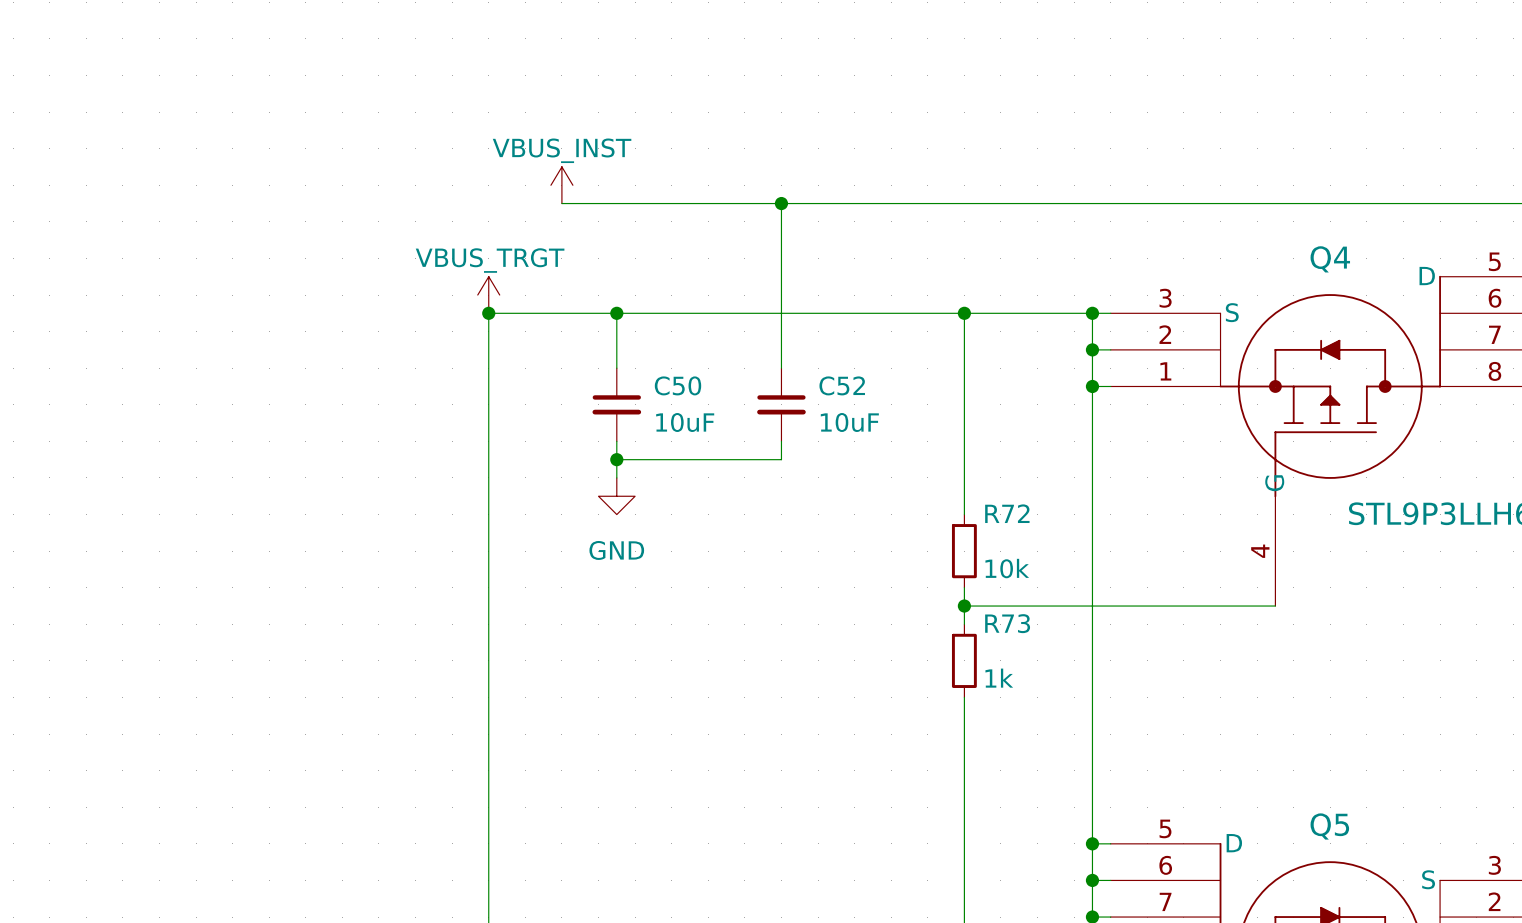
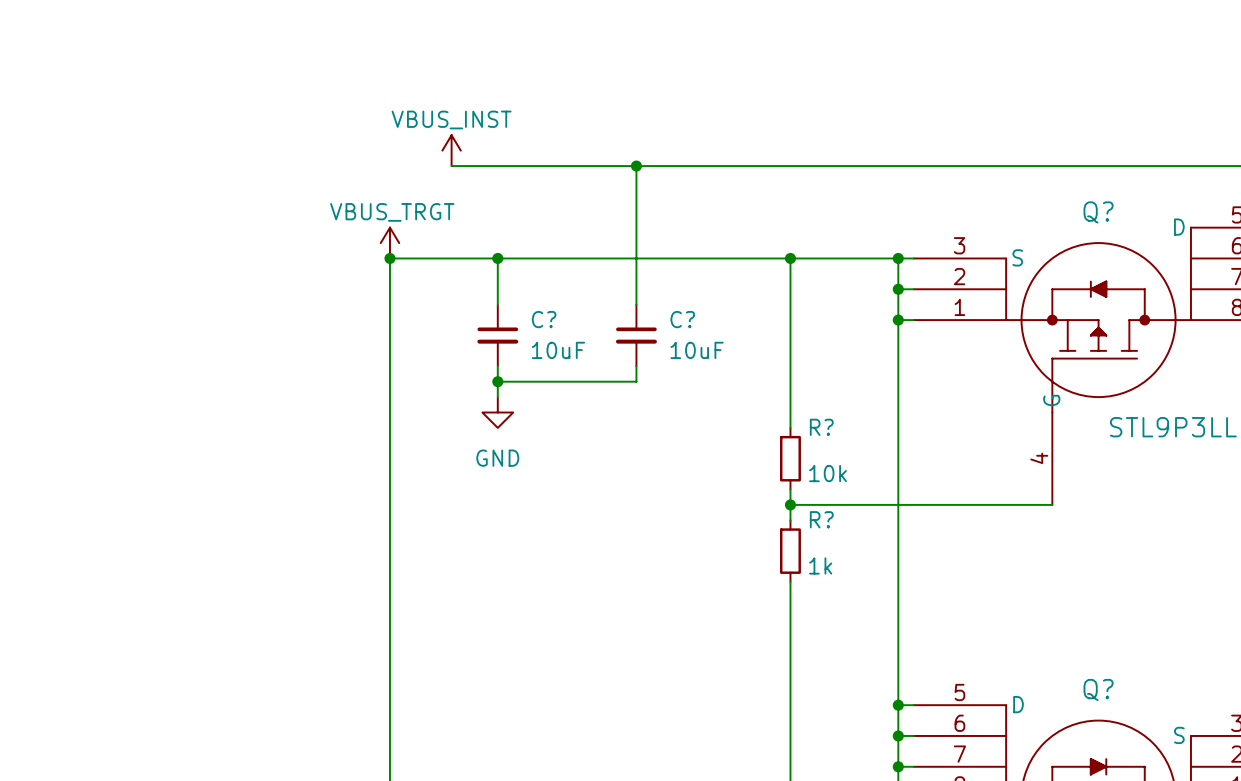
Q4 name: Q4 (1330, 259) -> Q? (1098, 212)
C50 name: C50 (677, 385) -> C? (544, 319)
C52 name: C52 (842, 385) -> C? (682, 319)
R72 name: R72 (1007, 513) -> R? (821, 427)
R73 name: R73 (1007, 623) -> R? (821, 519)
Q5 name: Q5 (1329, 826) -> Q? (1098, 689)

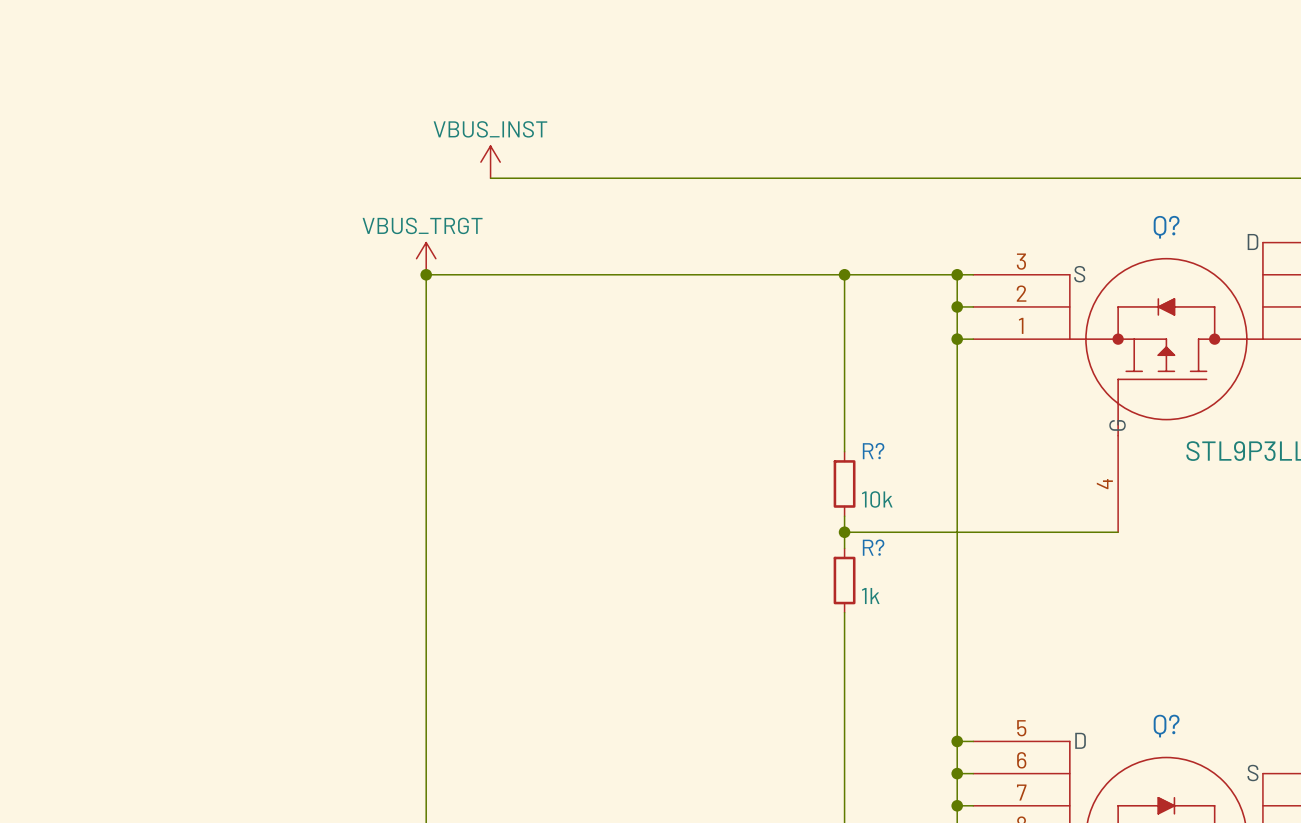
wire: (636, 166) (636, 304) -> none
junction: (636, 166) -> none
wire: (497, 258) (497, 304) -> none
junction: (497, 258) -> none
C?: 10uF (497, 335) -> none
C?: 10uF (636, 335) -> none
wire: (497, 366) (497, 397) -> none
wire: (636, 366) (636, 381) (497, 381) -> none
junction: (497, 381) -> none
power symbol: GND (497, 412) -> none

